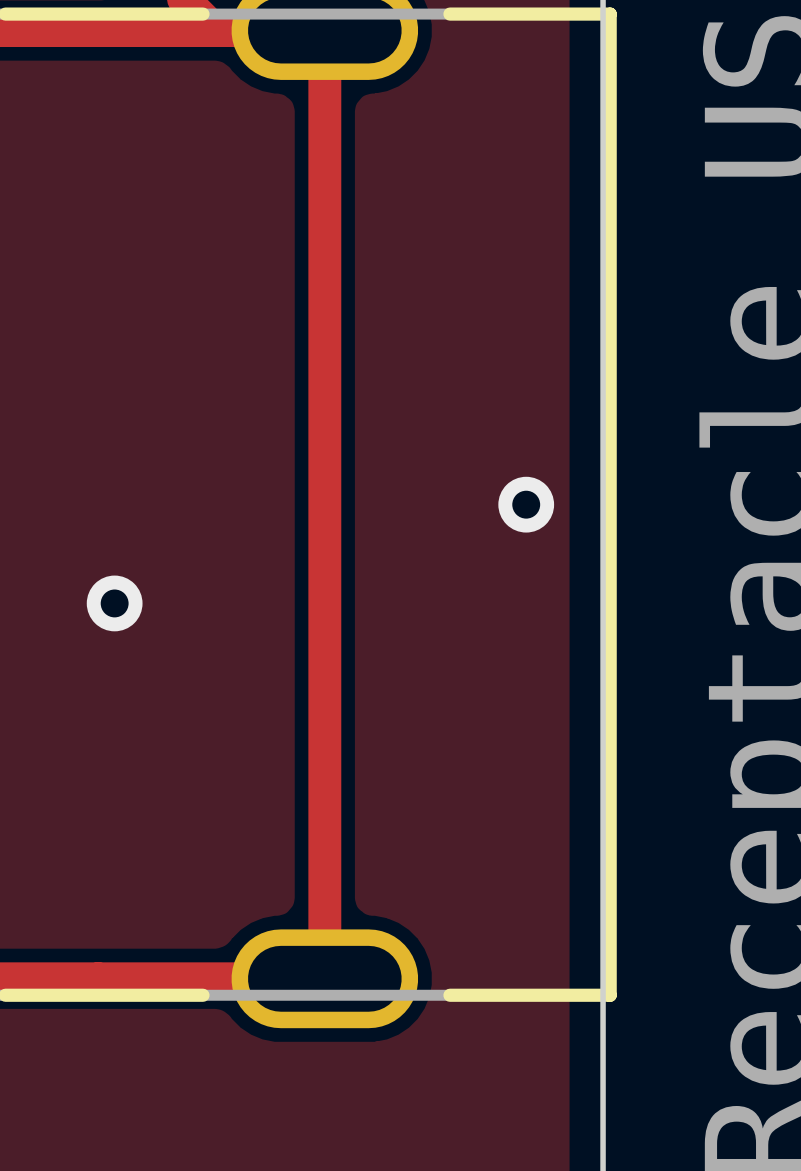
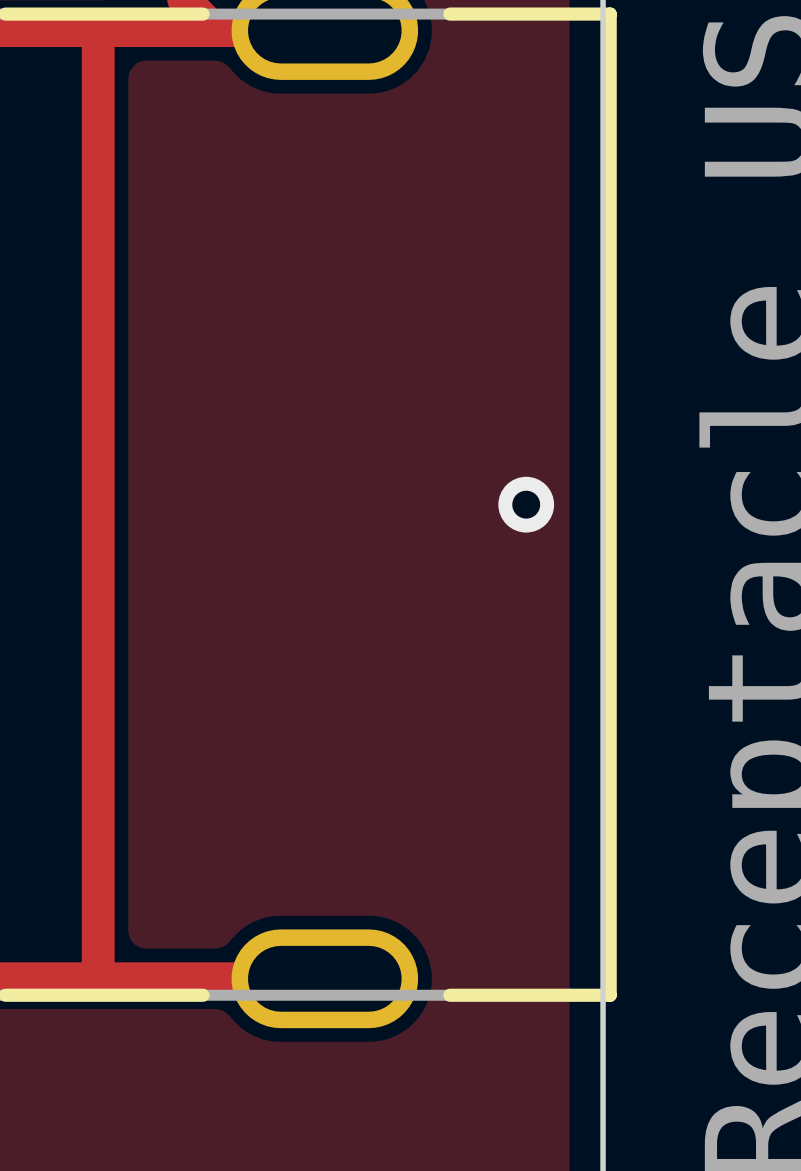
track: (324, 30) (324, 978) -> (98, 30) (98, 978)
via: (114, 603) -> none

